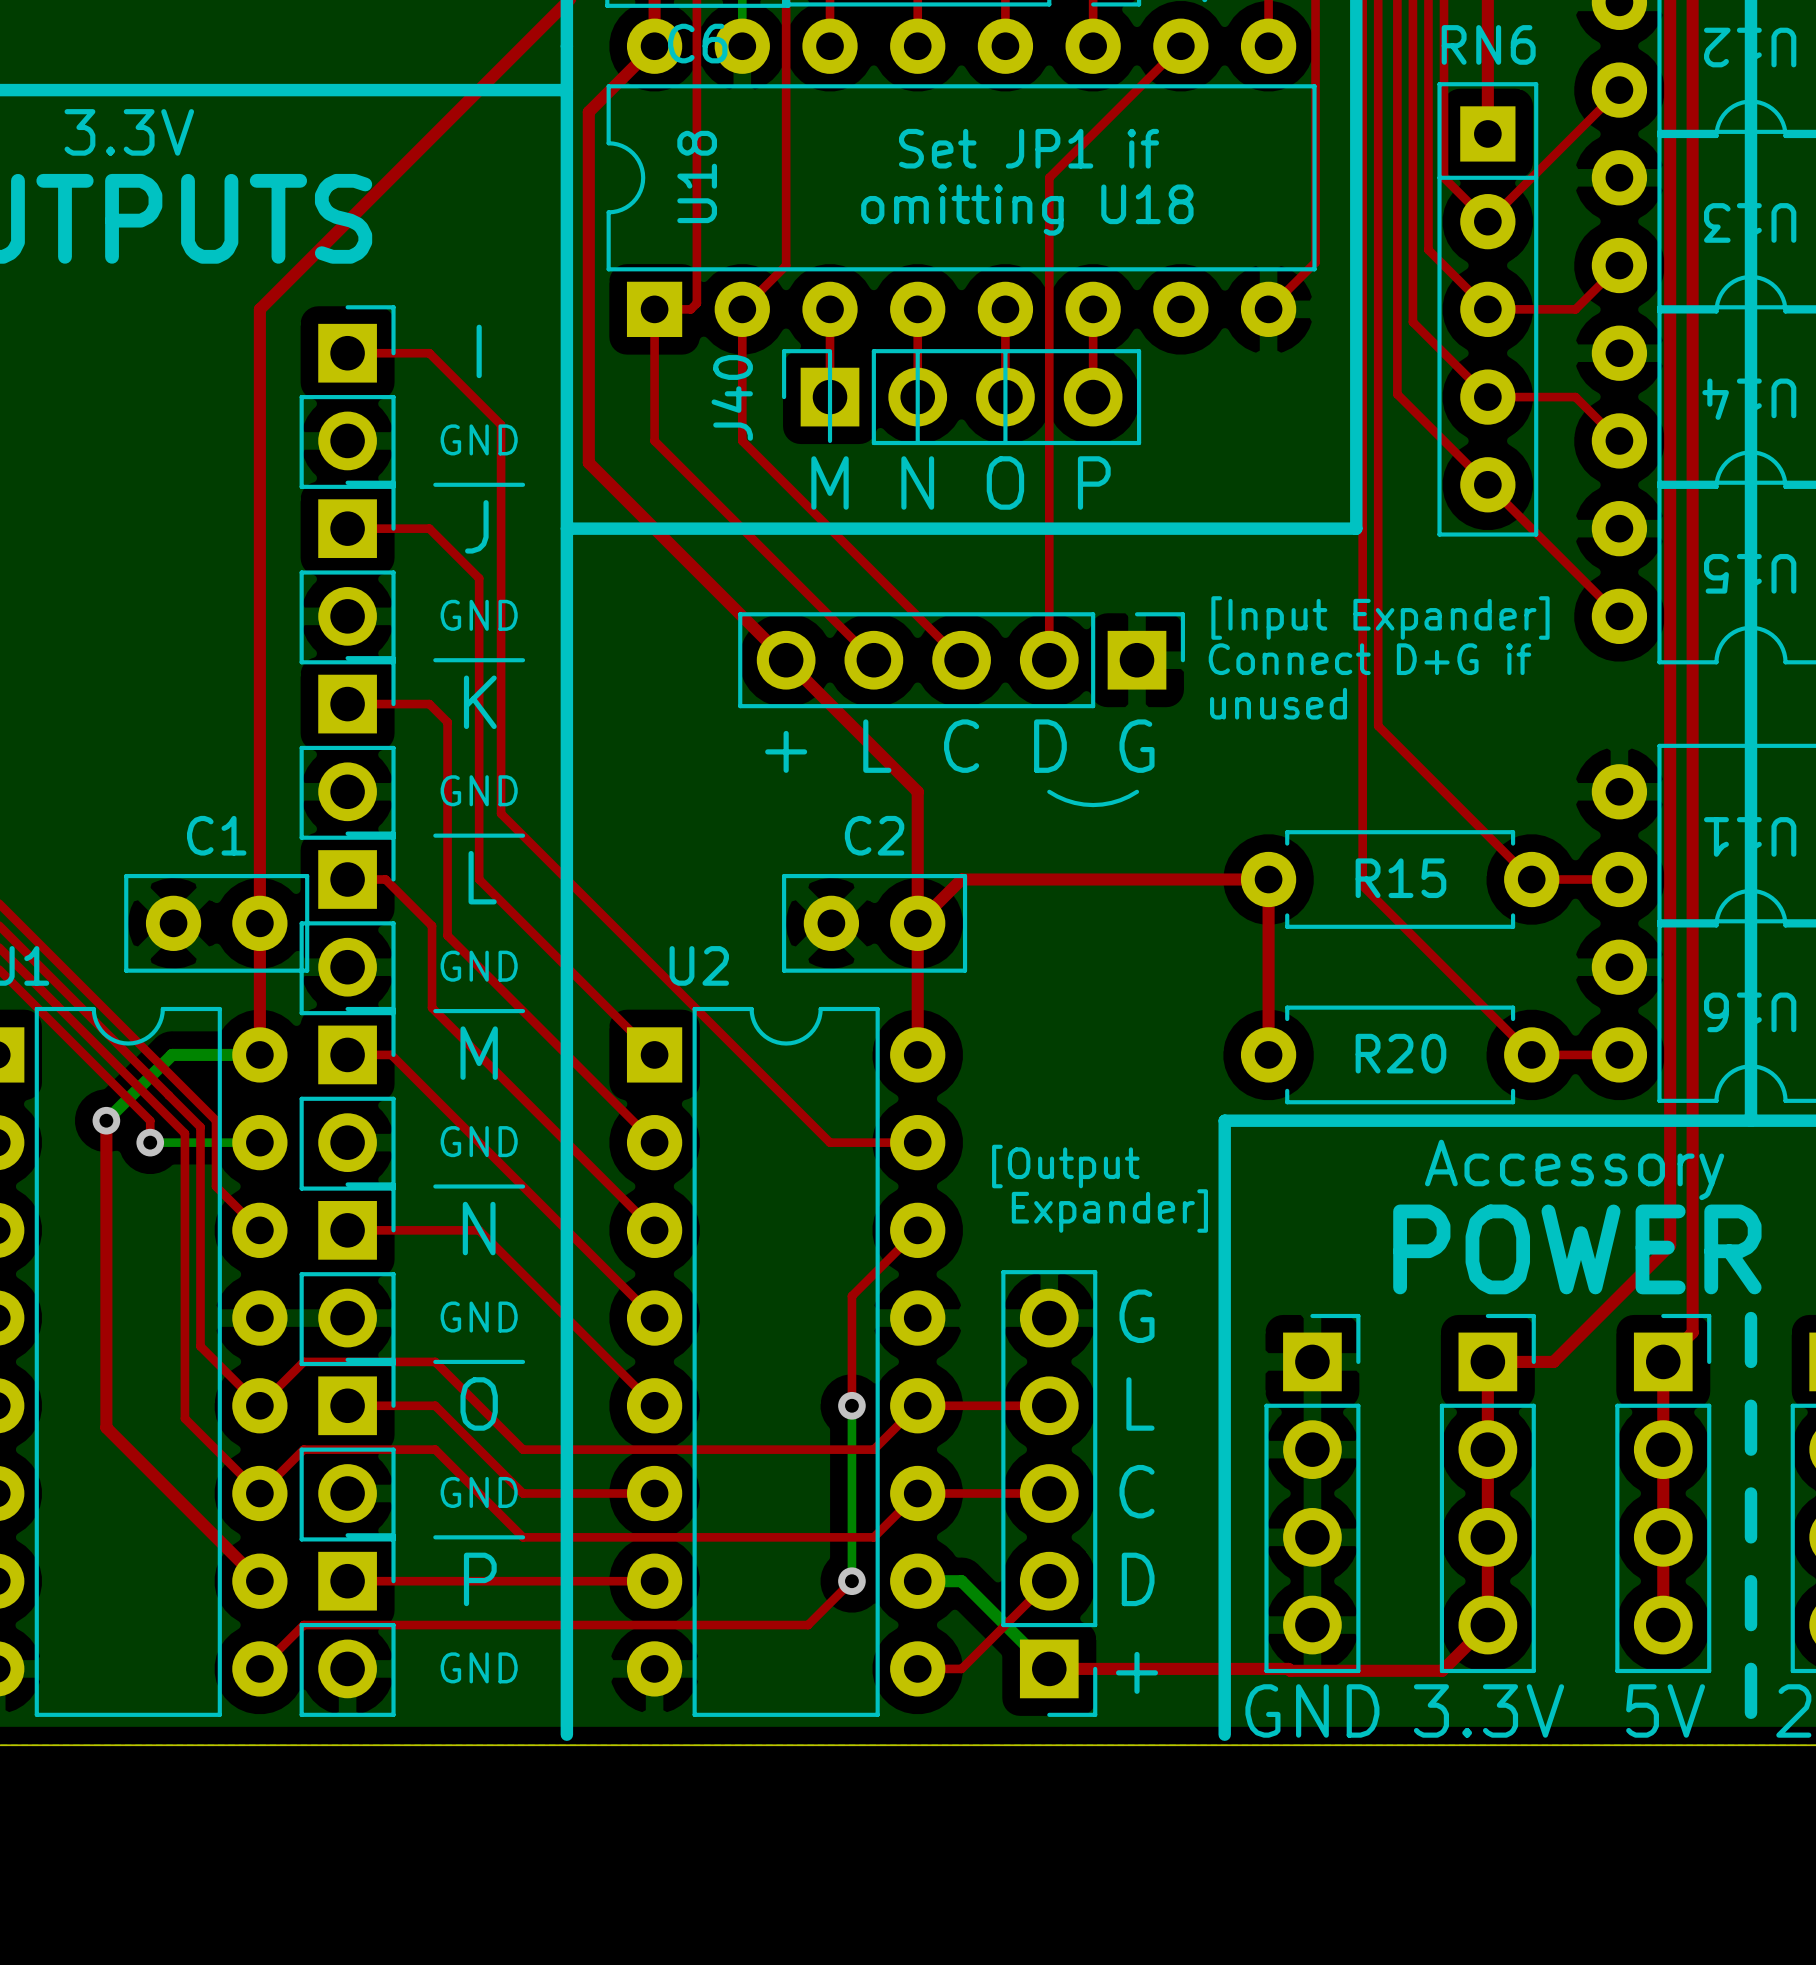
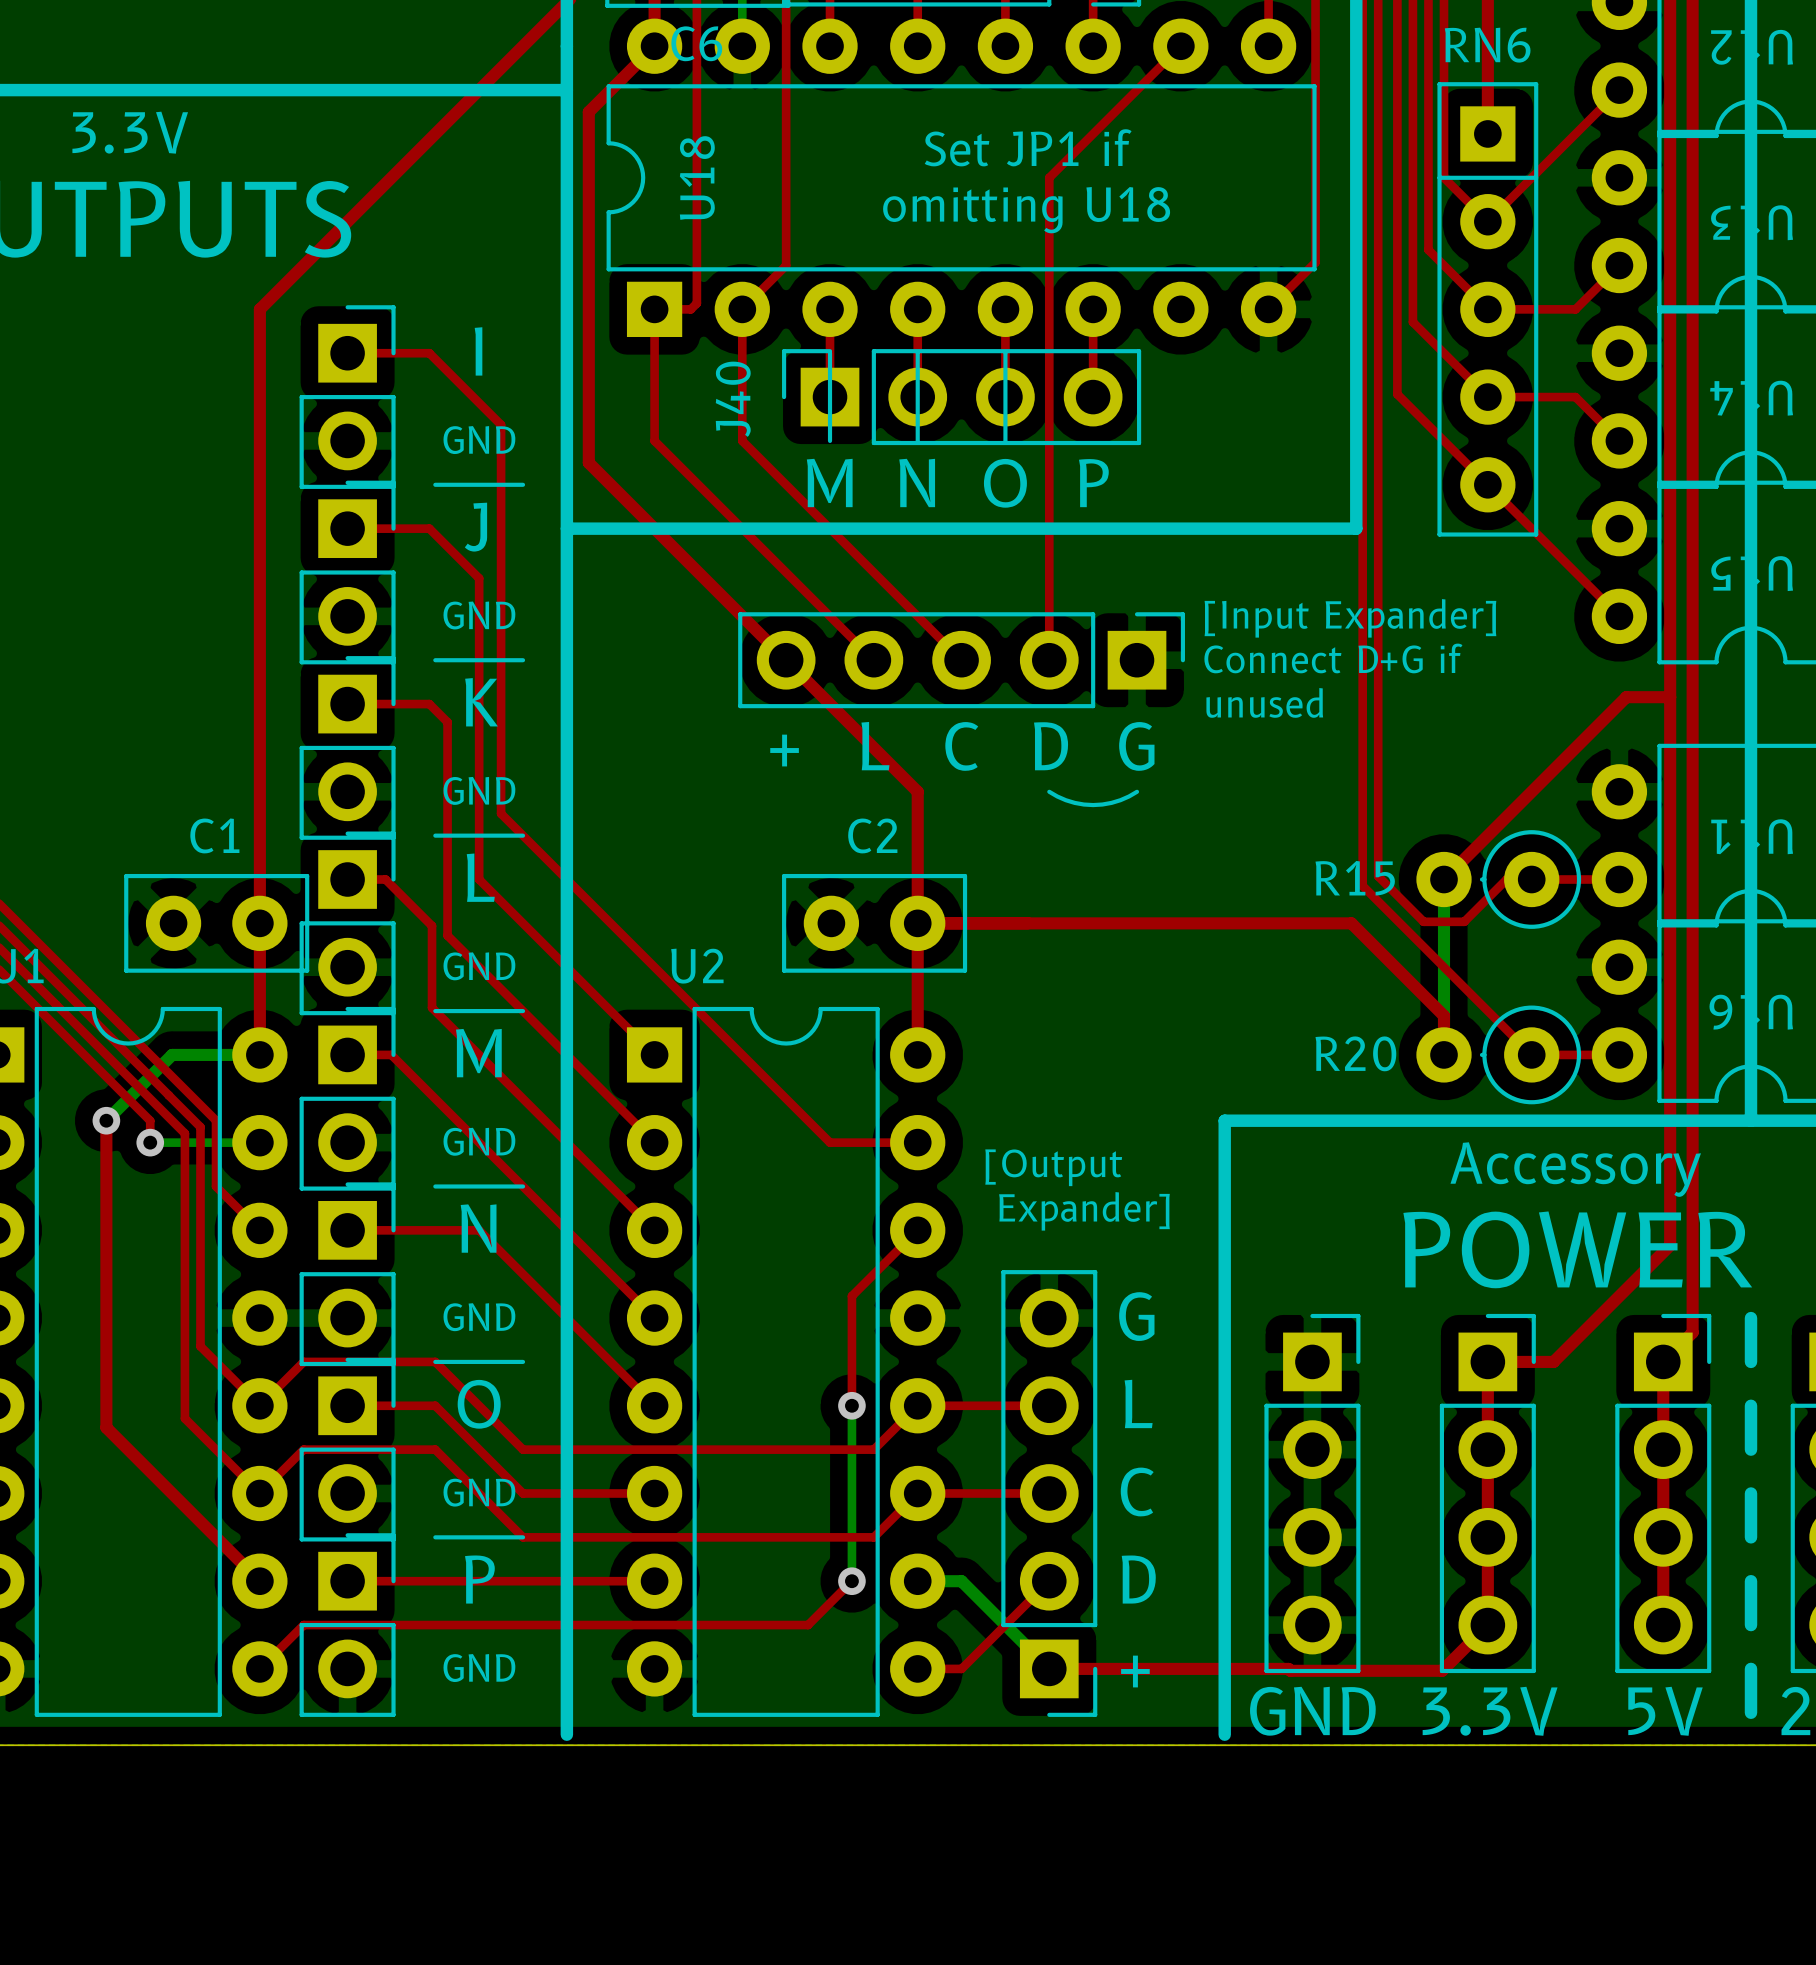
top track: none -> (1670, 697) (1626, 697) (1444, 879)
top track: (1378, 726) (1531, 879) -> (1378, 726) (1378, 876) (1423, 921) (1464, 921) (1506, 879) (1531, 879)
R15 footprint: [1240, 830, 1560, 929] -> [1416, 830, 1582, 929]
R15 name position: R15 (1400, 878) -> R15 (1355, 878)
bottom track: none -> (1444, 879) (1444, 1054)
top track: (917, 923) (961, 879) (1268, 879) (1268, 1054) -> (917, 923) (1351, 923) (1444, 1015) (1444, 1054)
R20 footprint: [1240, 1005, 1560, 1105] -> [1416, 1005, 1582, 1105]
R20 name position: R20 (1400, 1053) -> R20 (1355, 1053)

